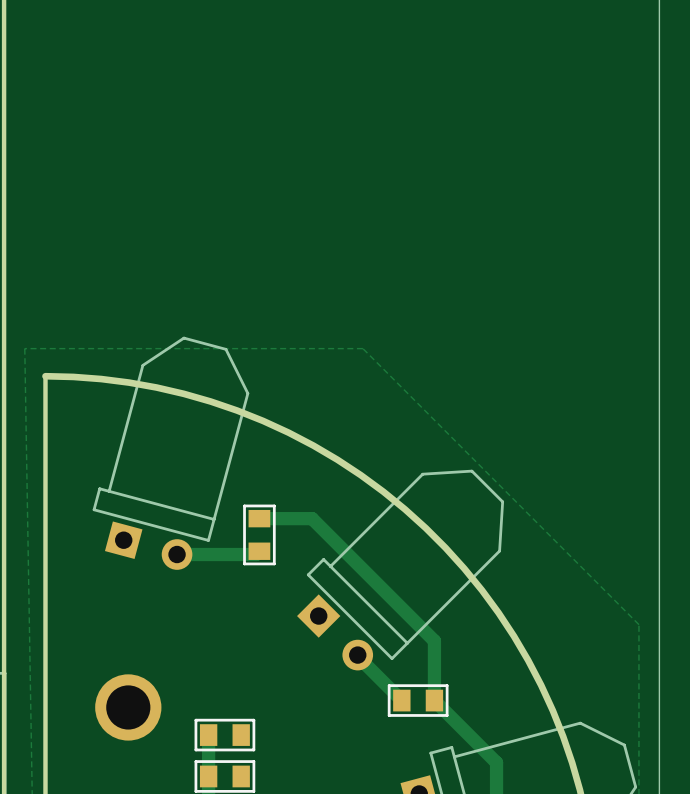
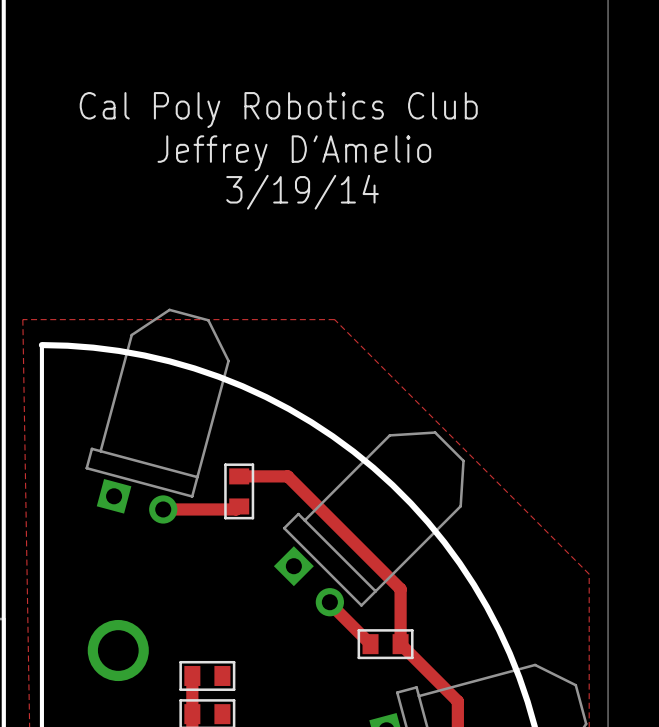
text: none -> Cal Poly Robotics Club (278, 110)
text: none -> Jeffrey D'Amelio (294, 153)
text: none -> 3/19/14 (302, 192)

